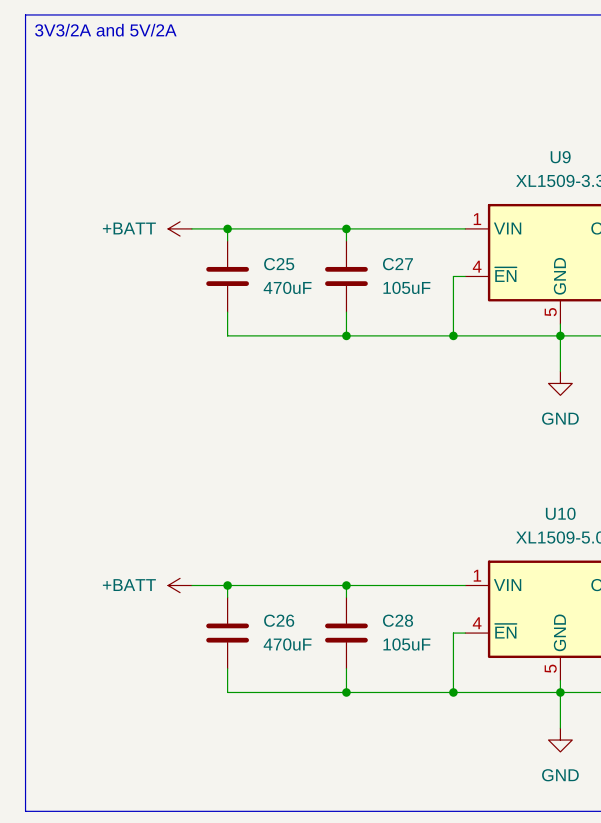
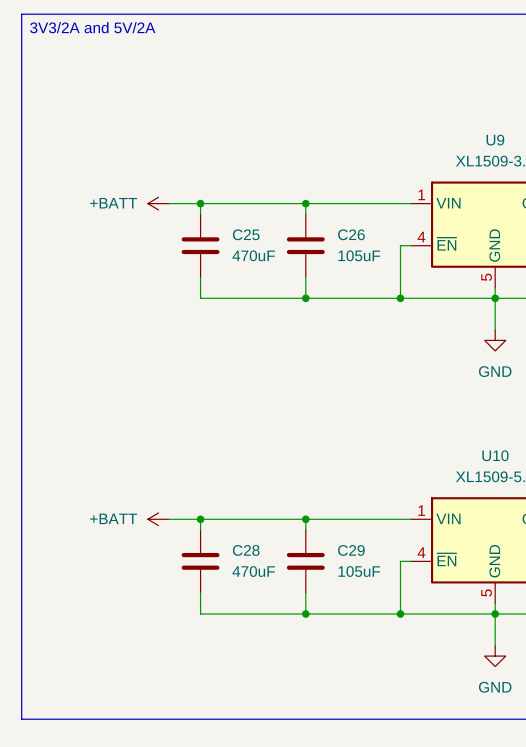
C27 name: C27 (397, 264) -> C26 (351, 234)
C26 name: C26 (279, 620) -> C28 (246, 550)
C28 name: C28 (398, 620) -> C29 (351, 550)

